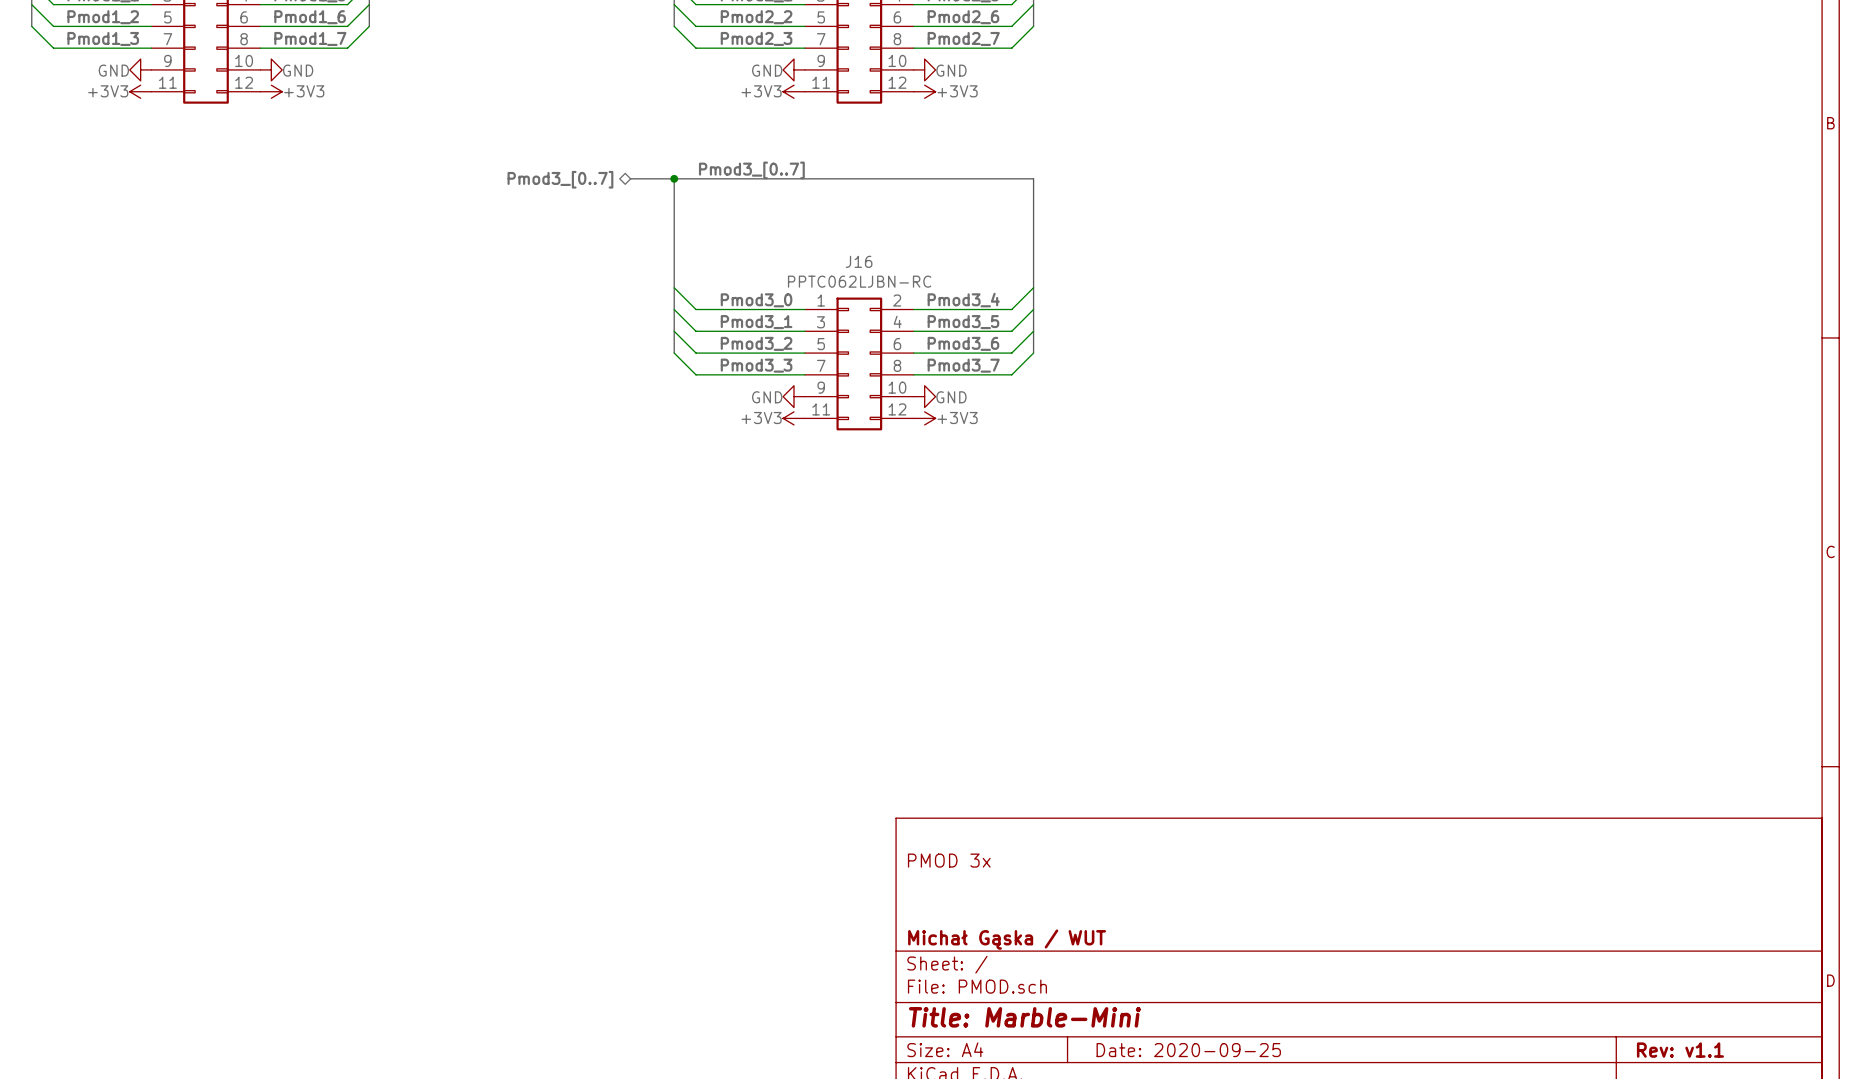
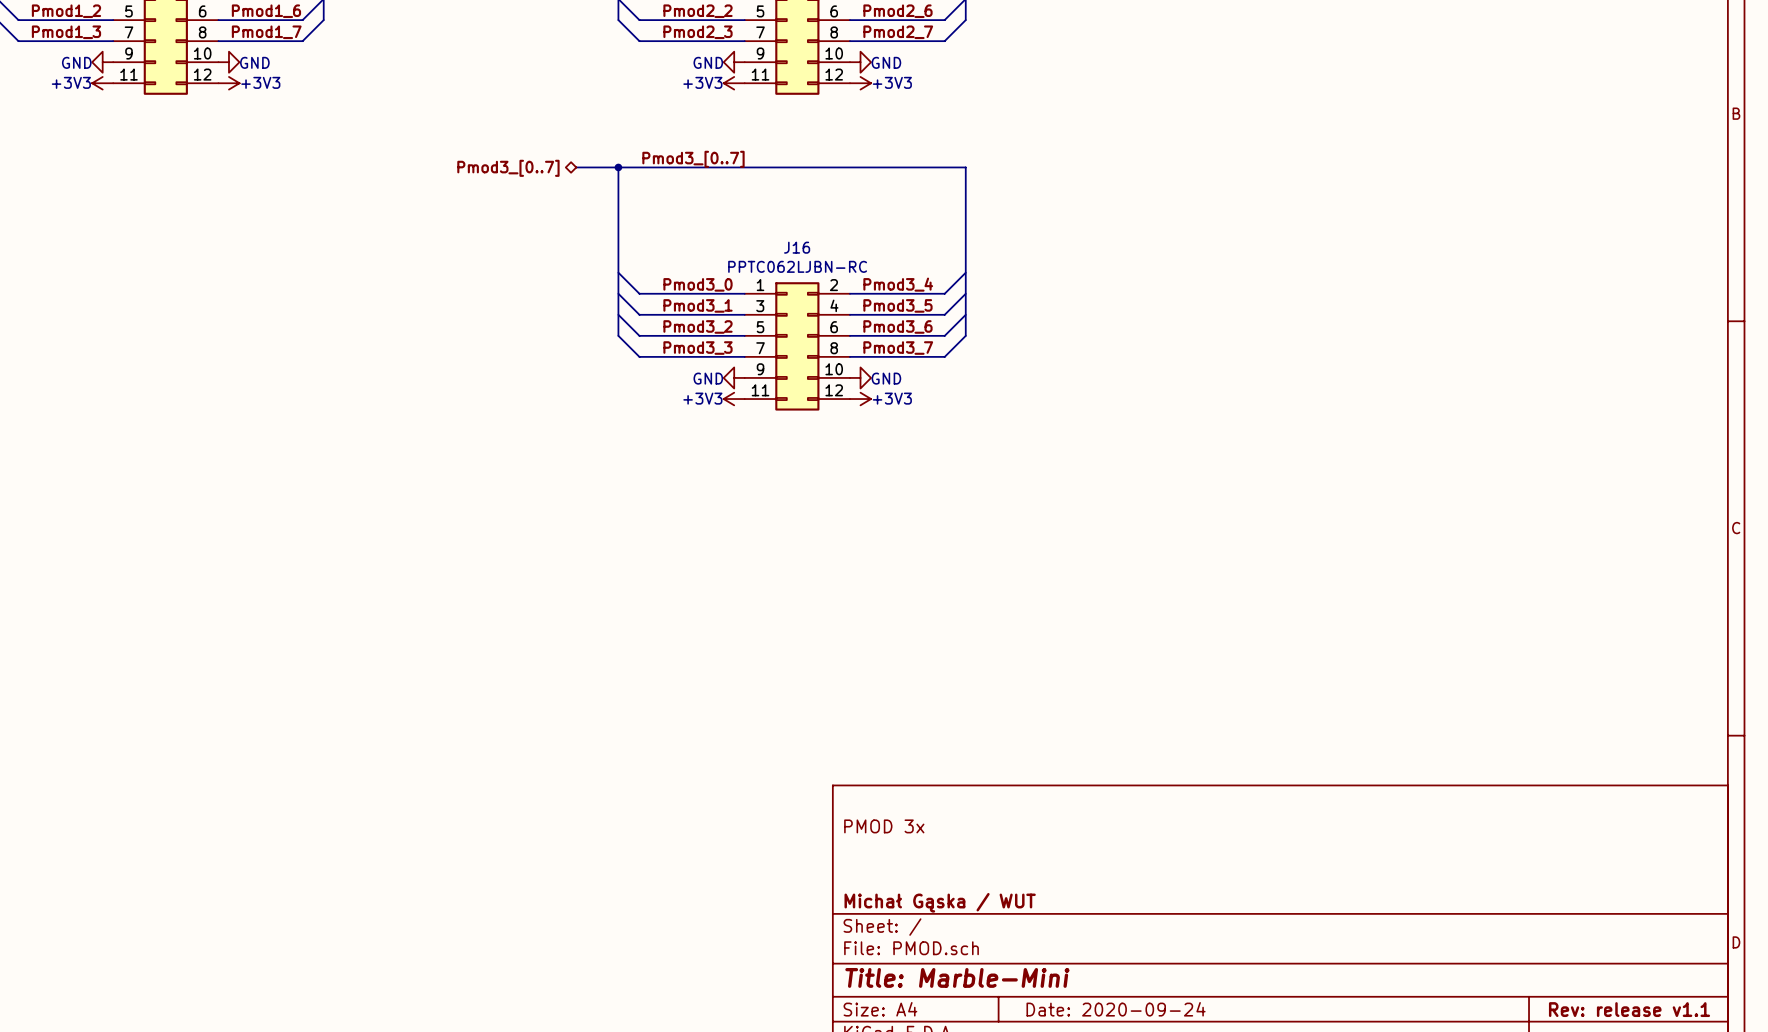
title block: Date: 2020-09-25 (1188, 1050) -> Date: 2020-09-24 (1116, 1009)
title block: Rev: v1.1 (1680, 1050) -> Rev: release v1.1 (1629, 1009)

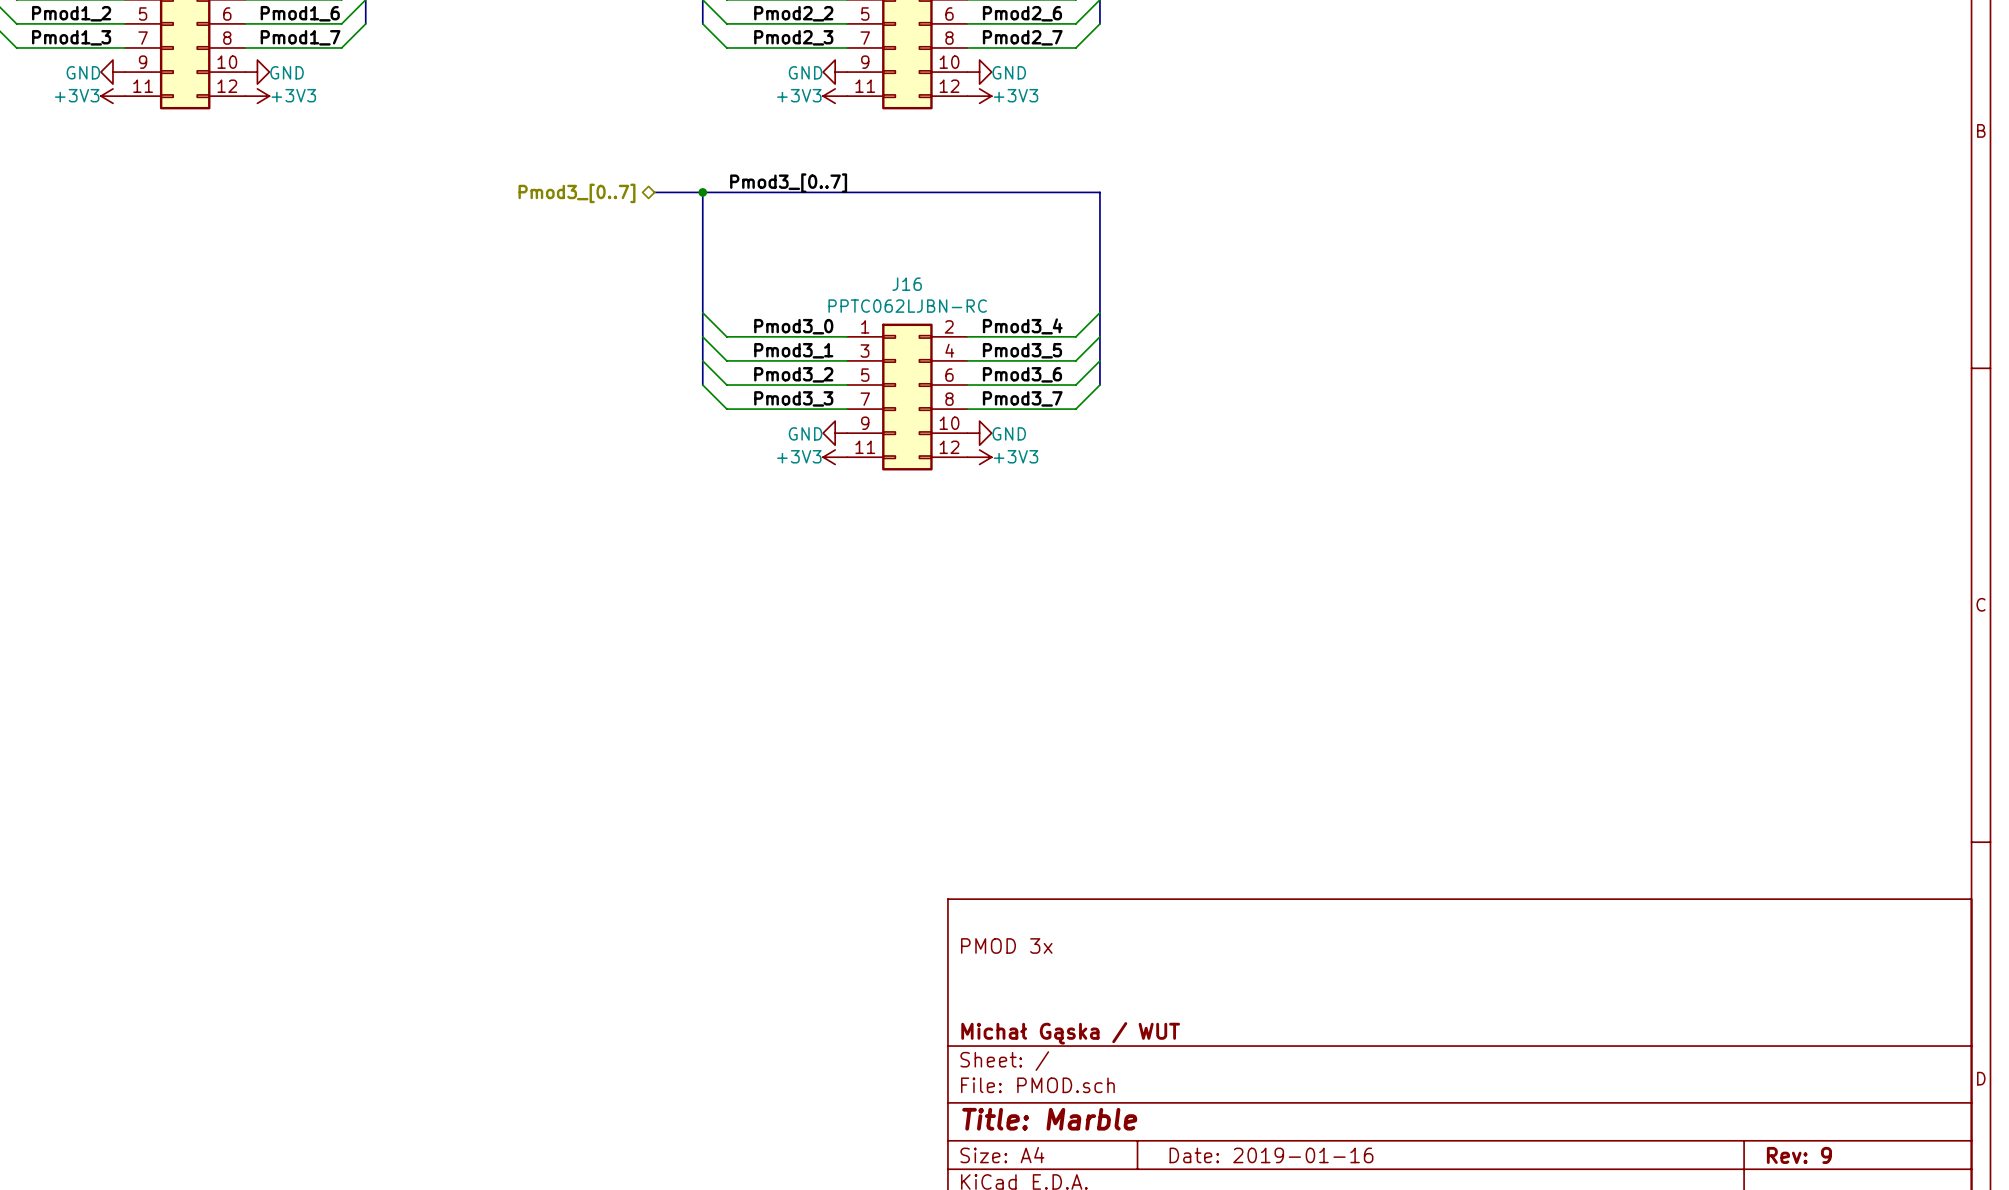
title block: Title: Marble-Mini (957, 977) -> Title: Marble (1049, 1119)
title block: Date: 2020-09-24 (1116, 1009) -> Date: 2019-01-16 (1271, 1155)
title block: Rev: release v1.1 (1629, 1009) -> Rev: 9 (1799, 1155)

